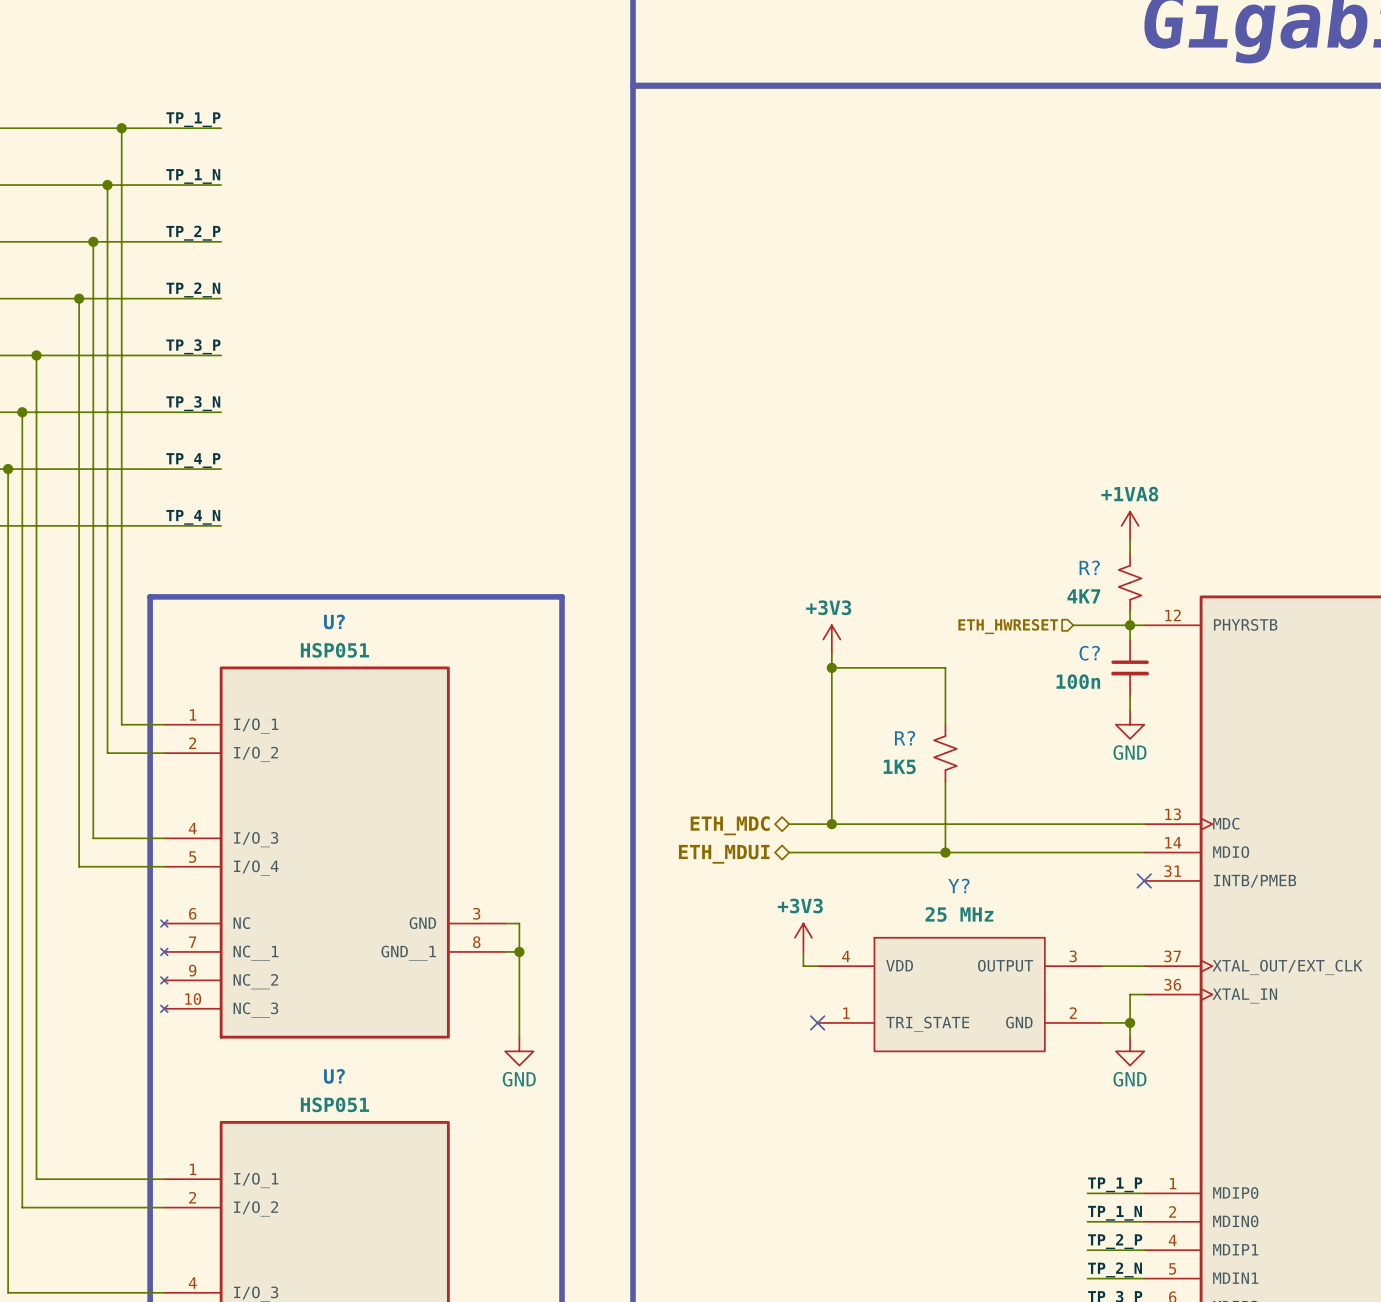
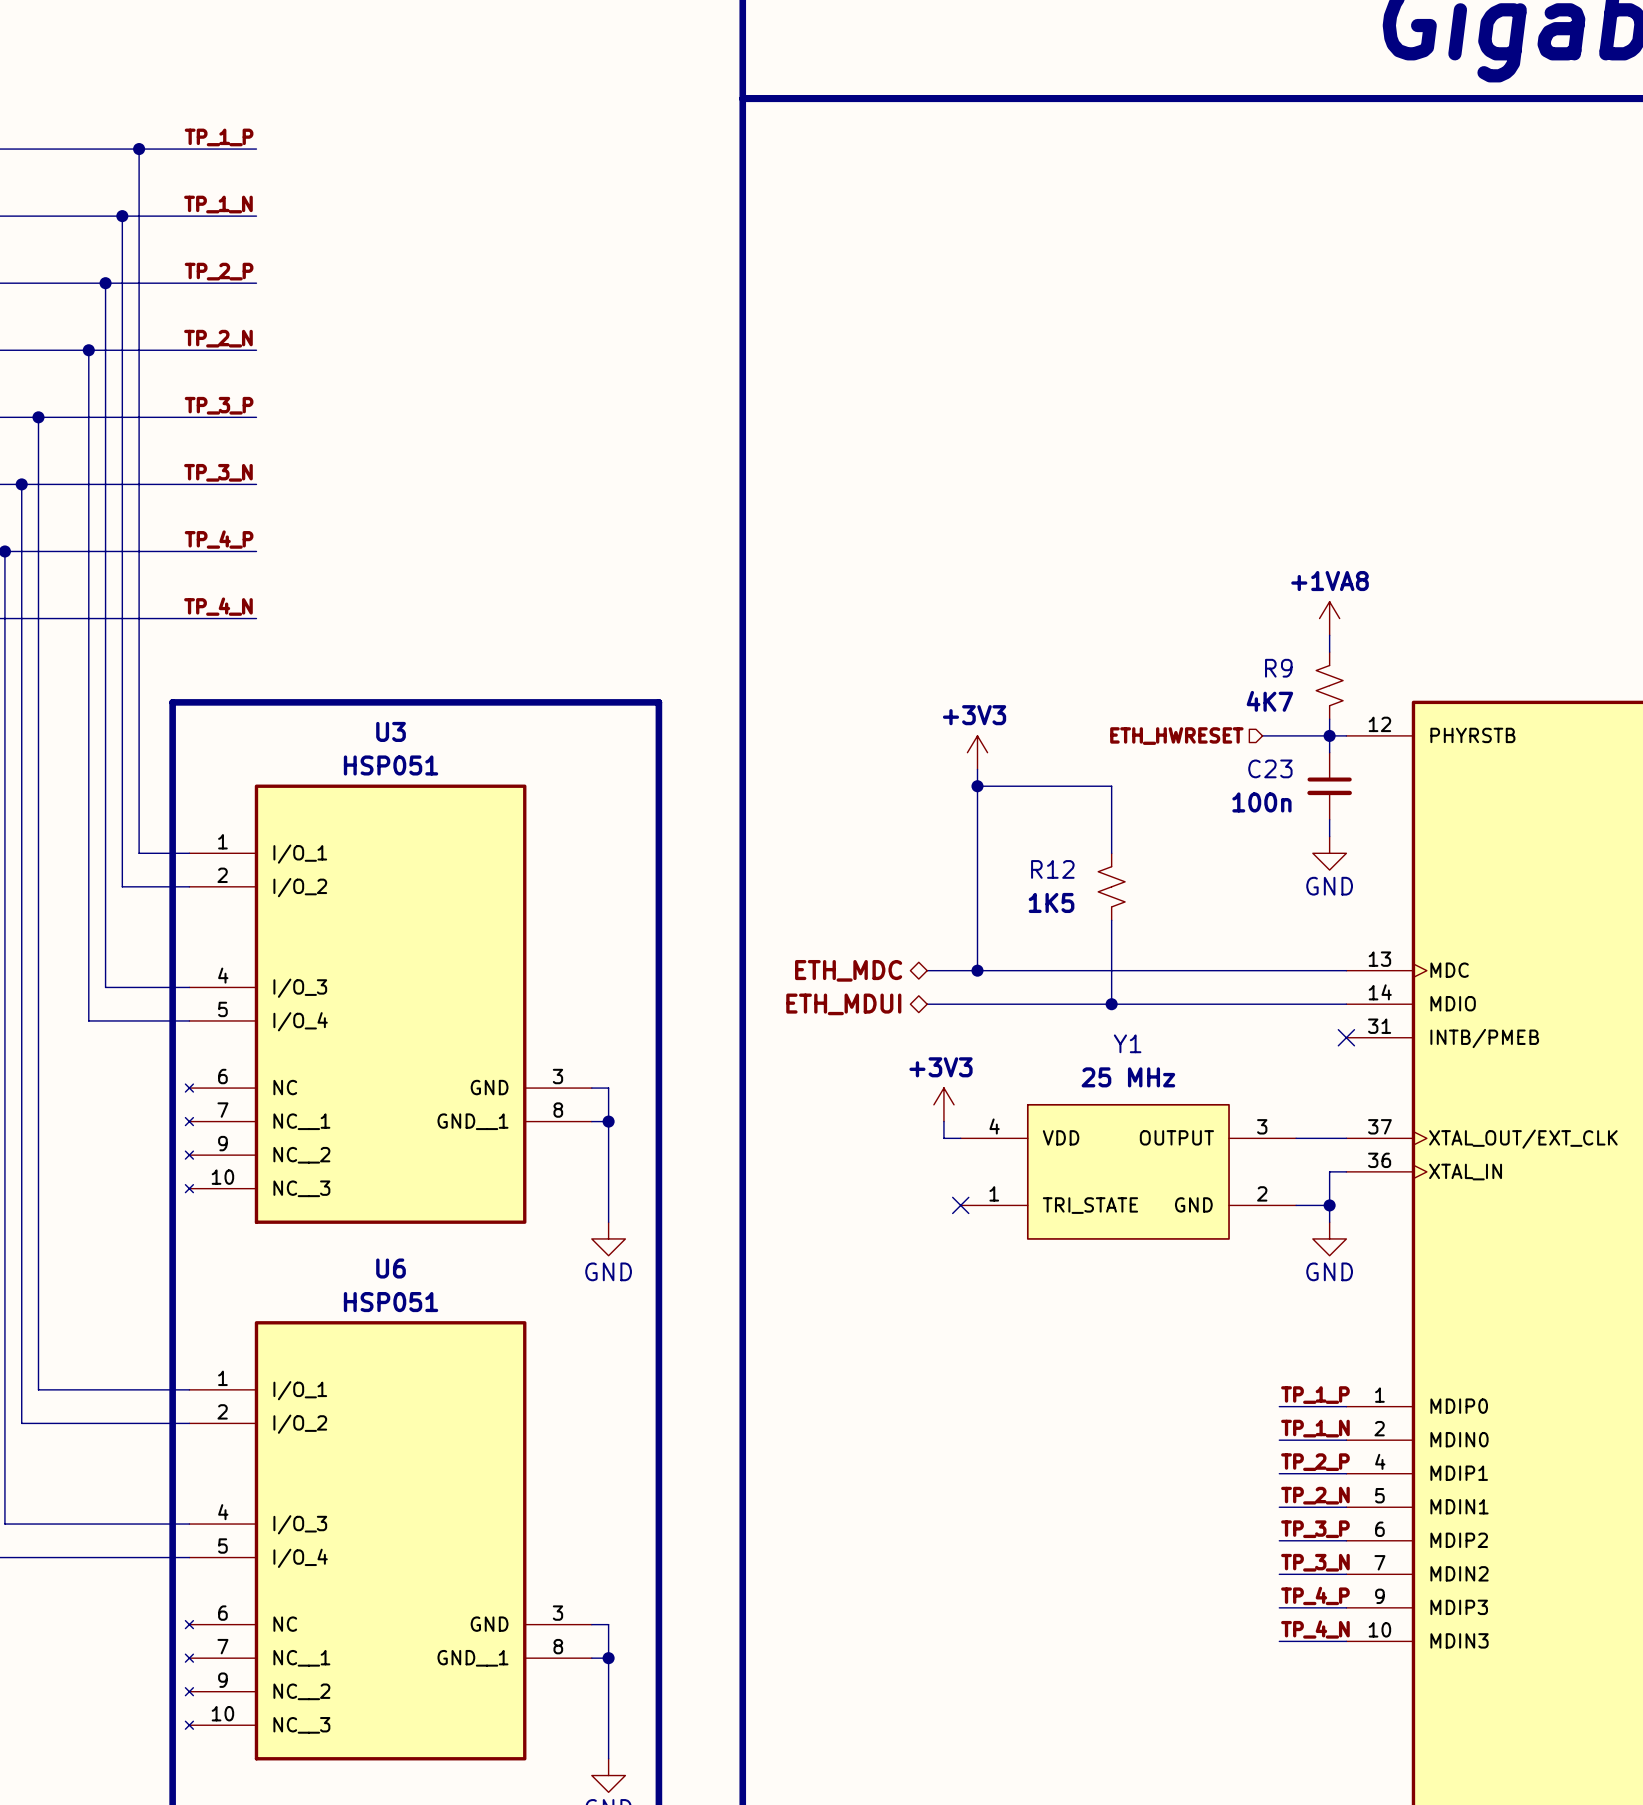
R? name: R? (1089, 567) -> R9 (1278, 668)
U? name: U? (334, 621) -> U3 (391, 731)
C? name: C? (1089, 653) -> C23 (1270, 768)
R? name: R? (905, 738) -> R12 (1052, 869)
Y? name: Y? (958, 885) -> Y1 (1127, 1043)
U? name: U? (334, 1076) -> U6 (391, 1268)

